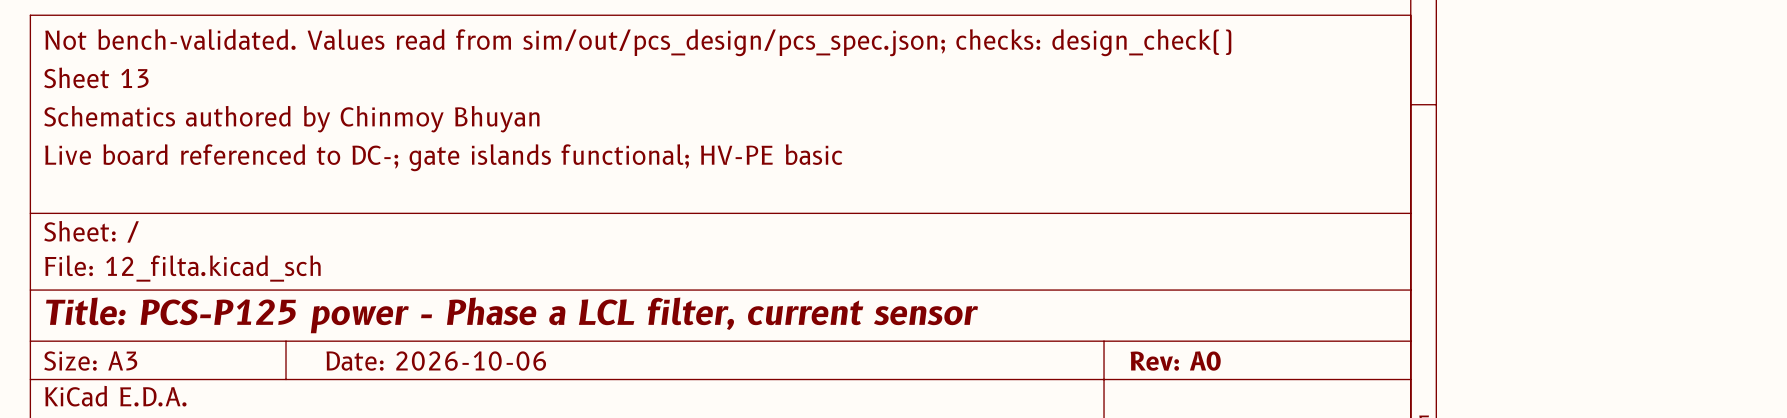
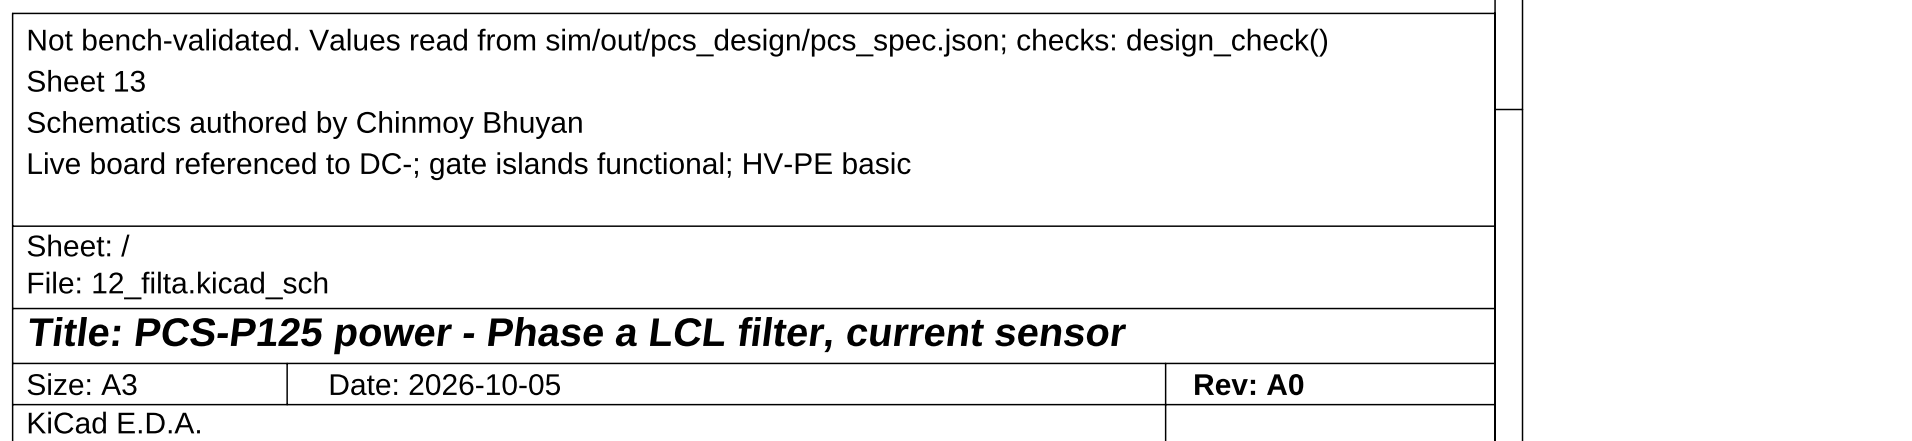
title block: Date: 2026-10-06 (436, 361) -> Date: 2026-10-05 (445, 384)

